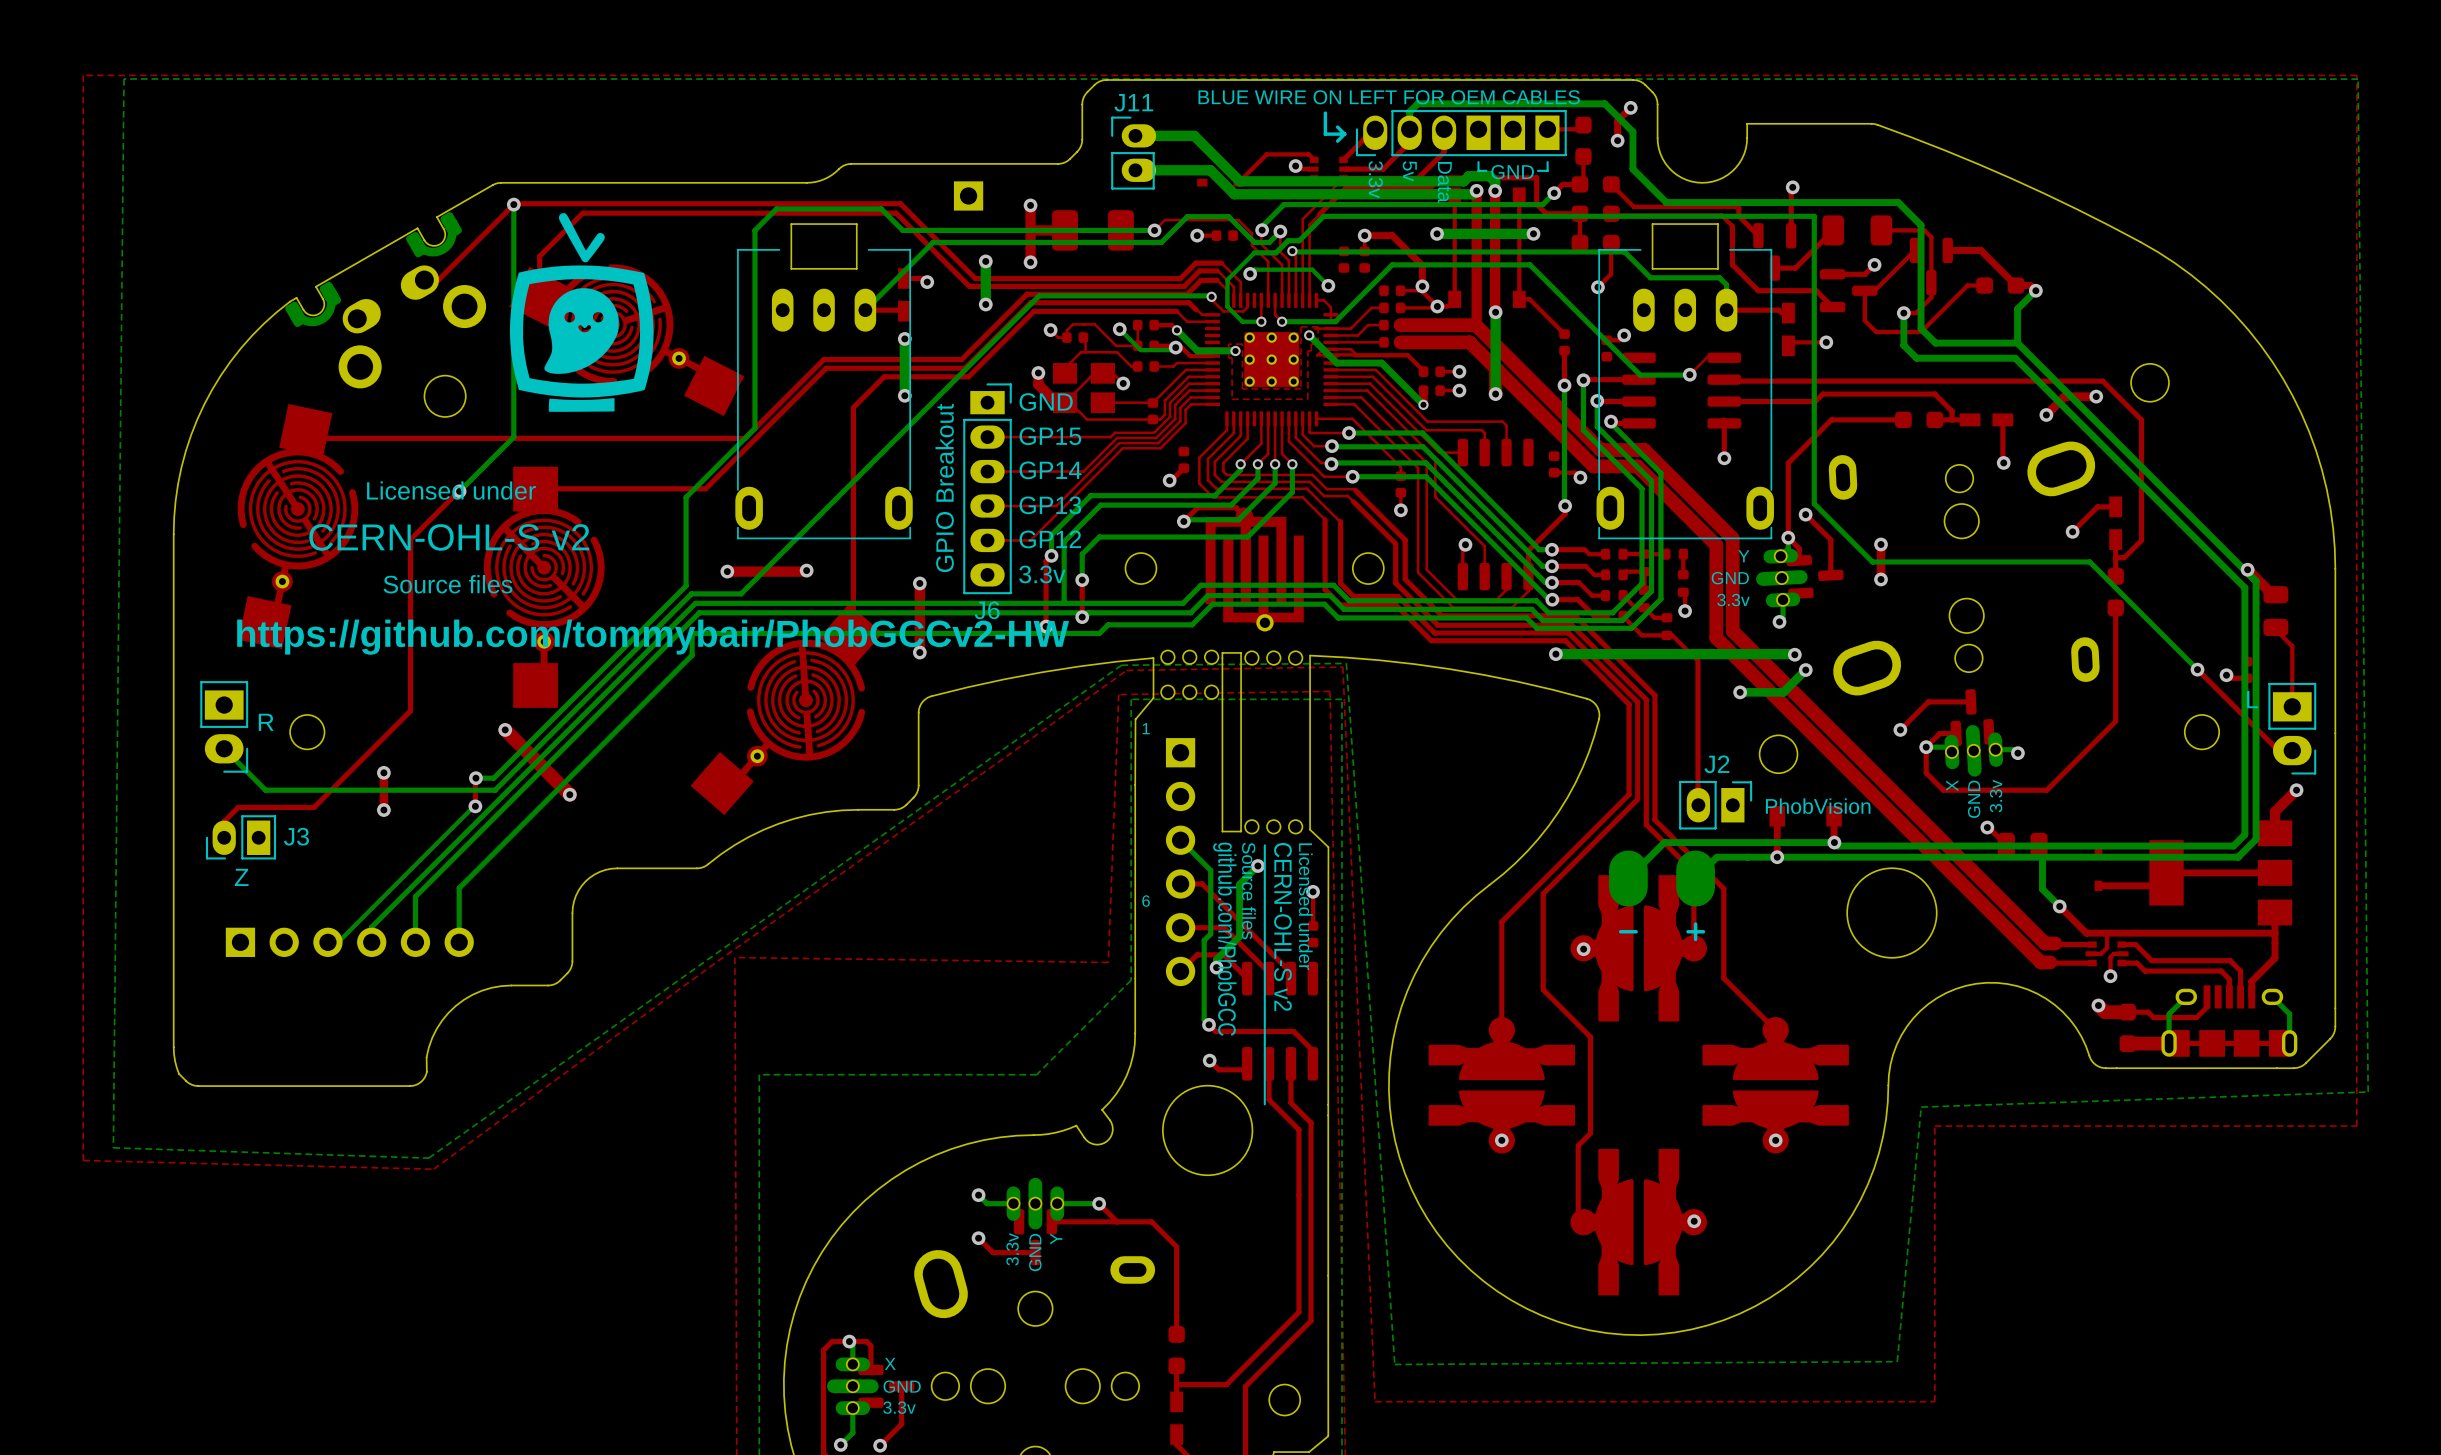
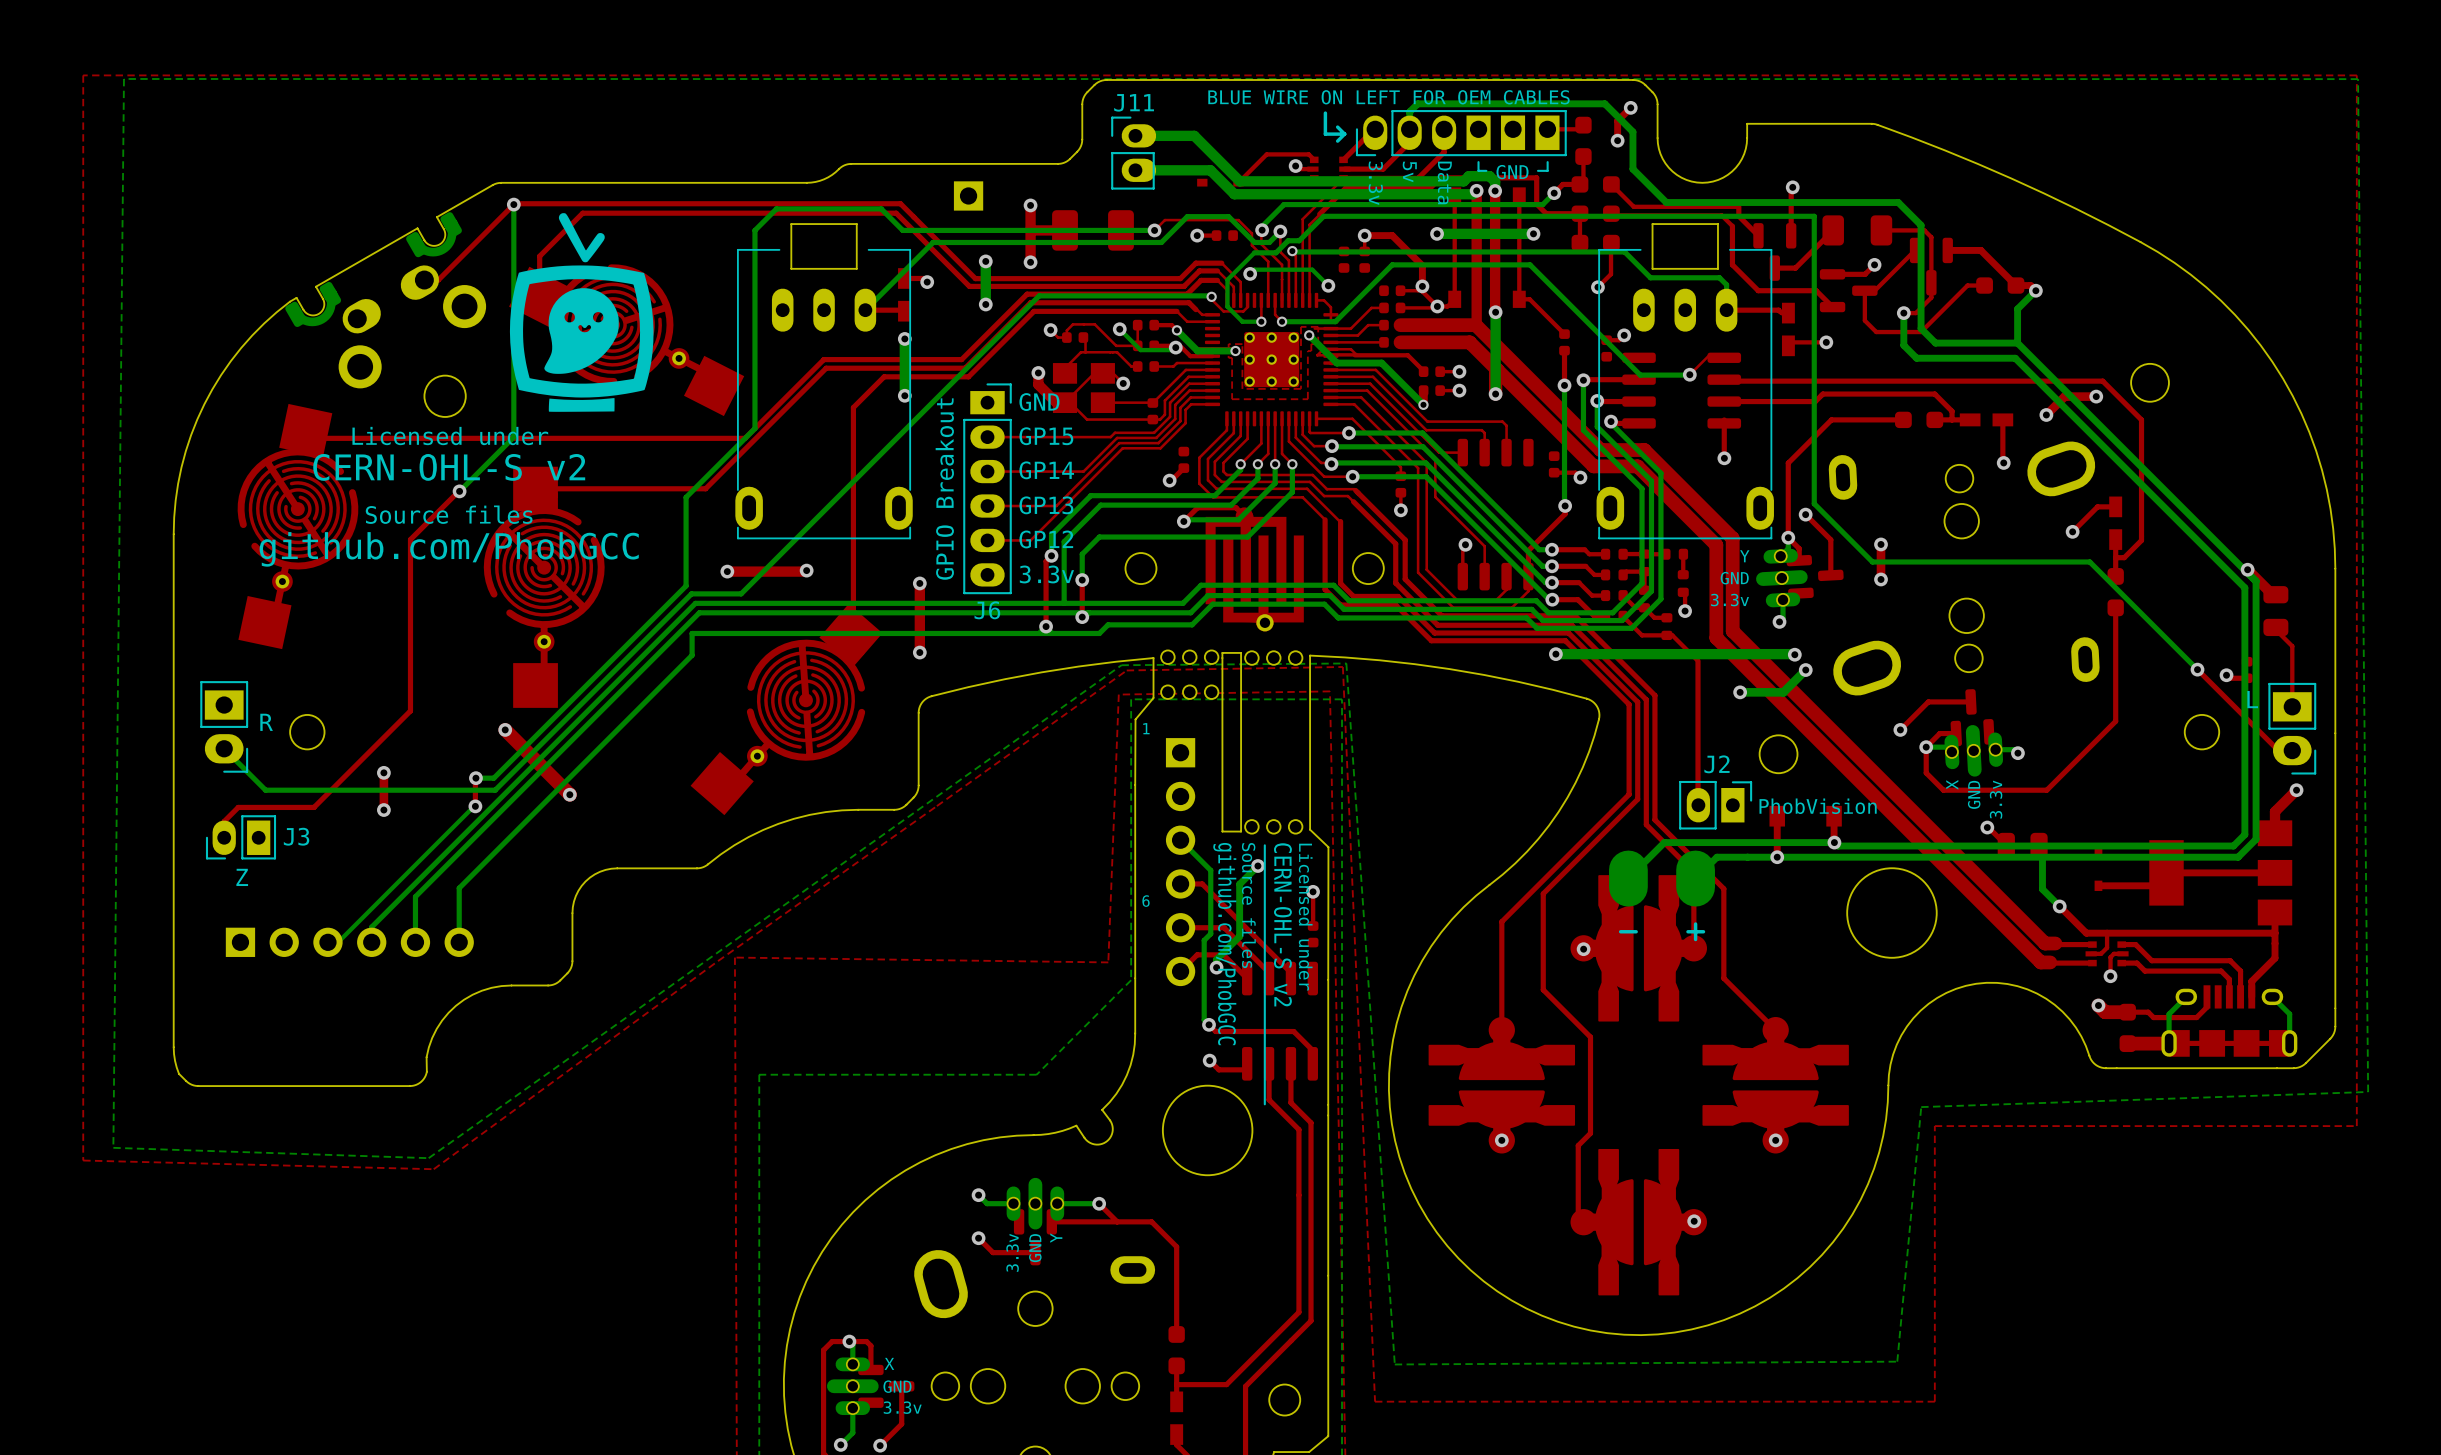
text: none -> CERN-OHL-S v2 (449, 467)
text position: Licensed under (451, 490) -> Licensed under (450, 436)
text: CERN-OHL-S v2 (449, 537) -> github.com/PhobGCC (449, 549)
text position: Source files (447, 584) -> Source files (449, 514)
text: https://github.com/tommybair/PhobGCCv2-HW (653, 637) -> none

